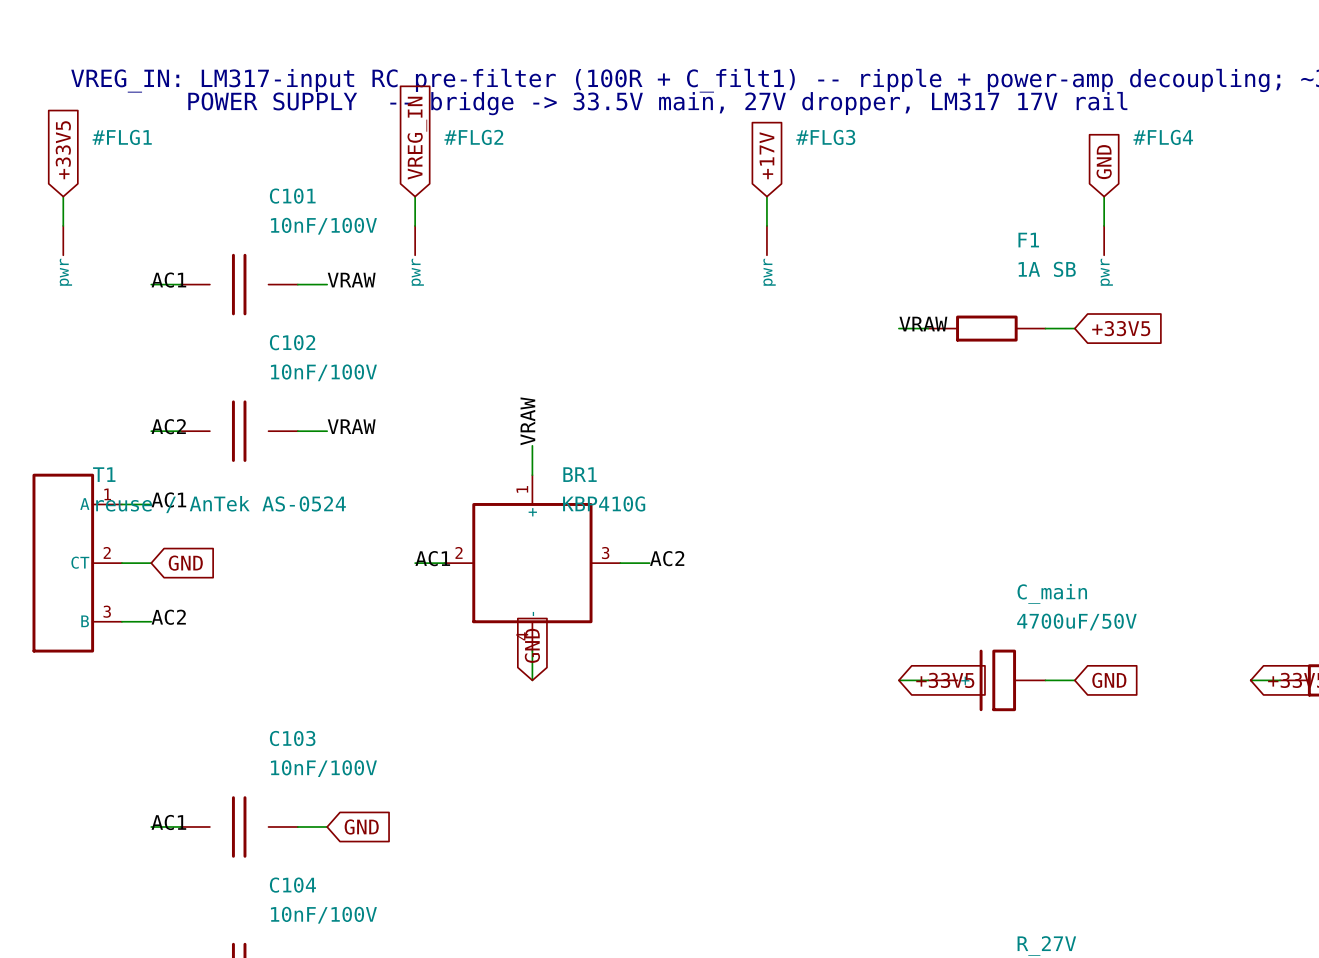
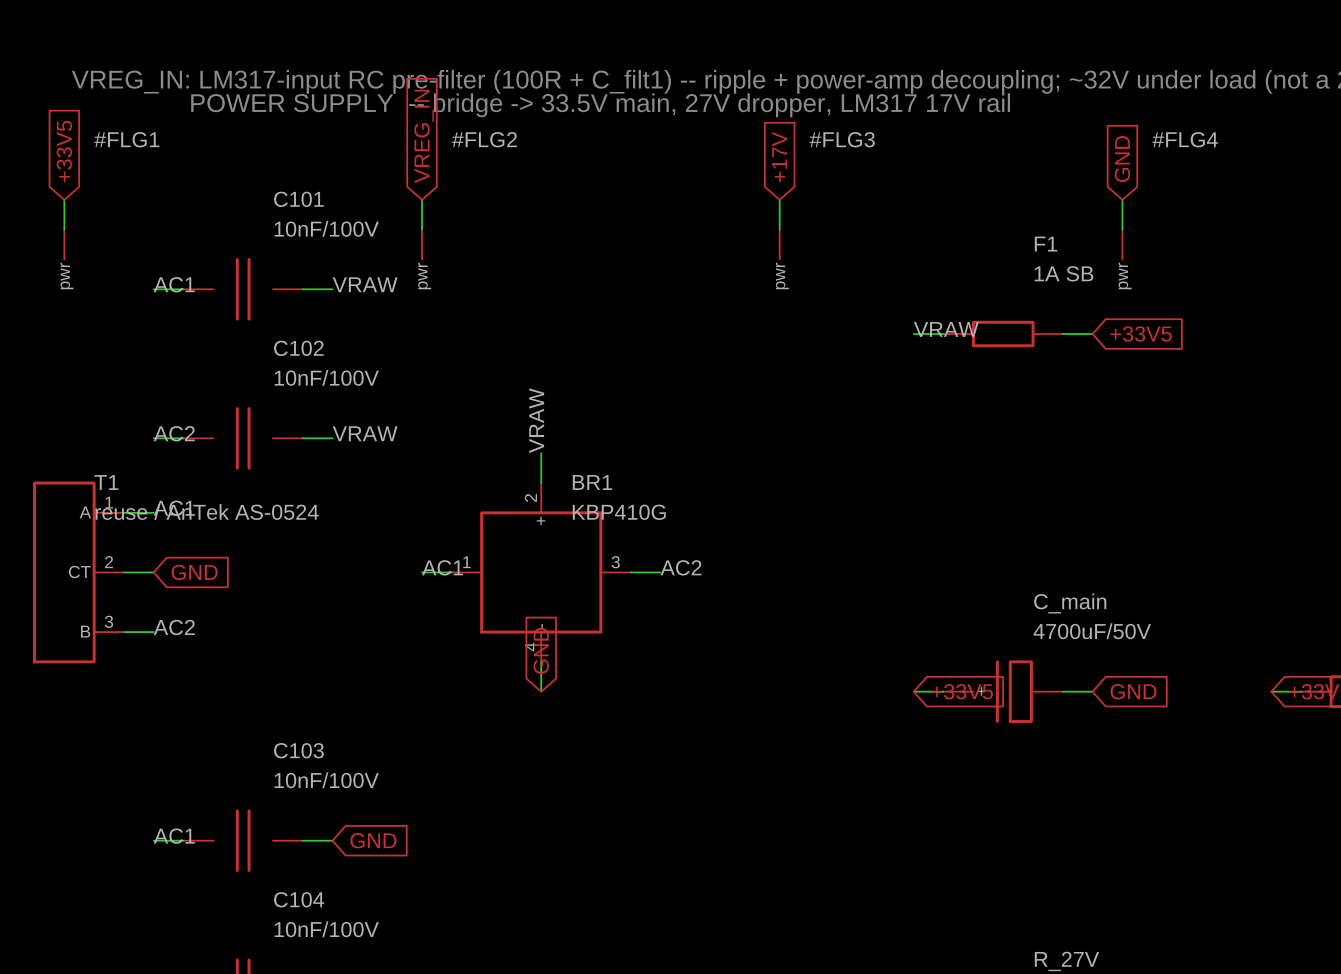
BR1 pin number: 1 (522, 489) -> 2 (530, 497)
BR1 pin number: 2 (459, 552) -> 1 (466, 562)

